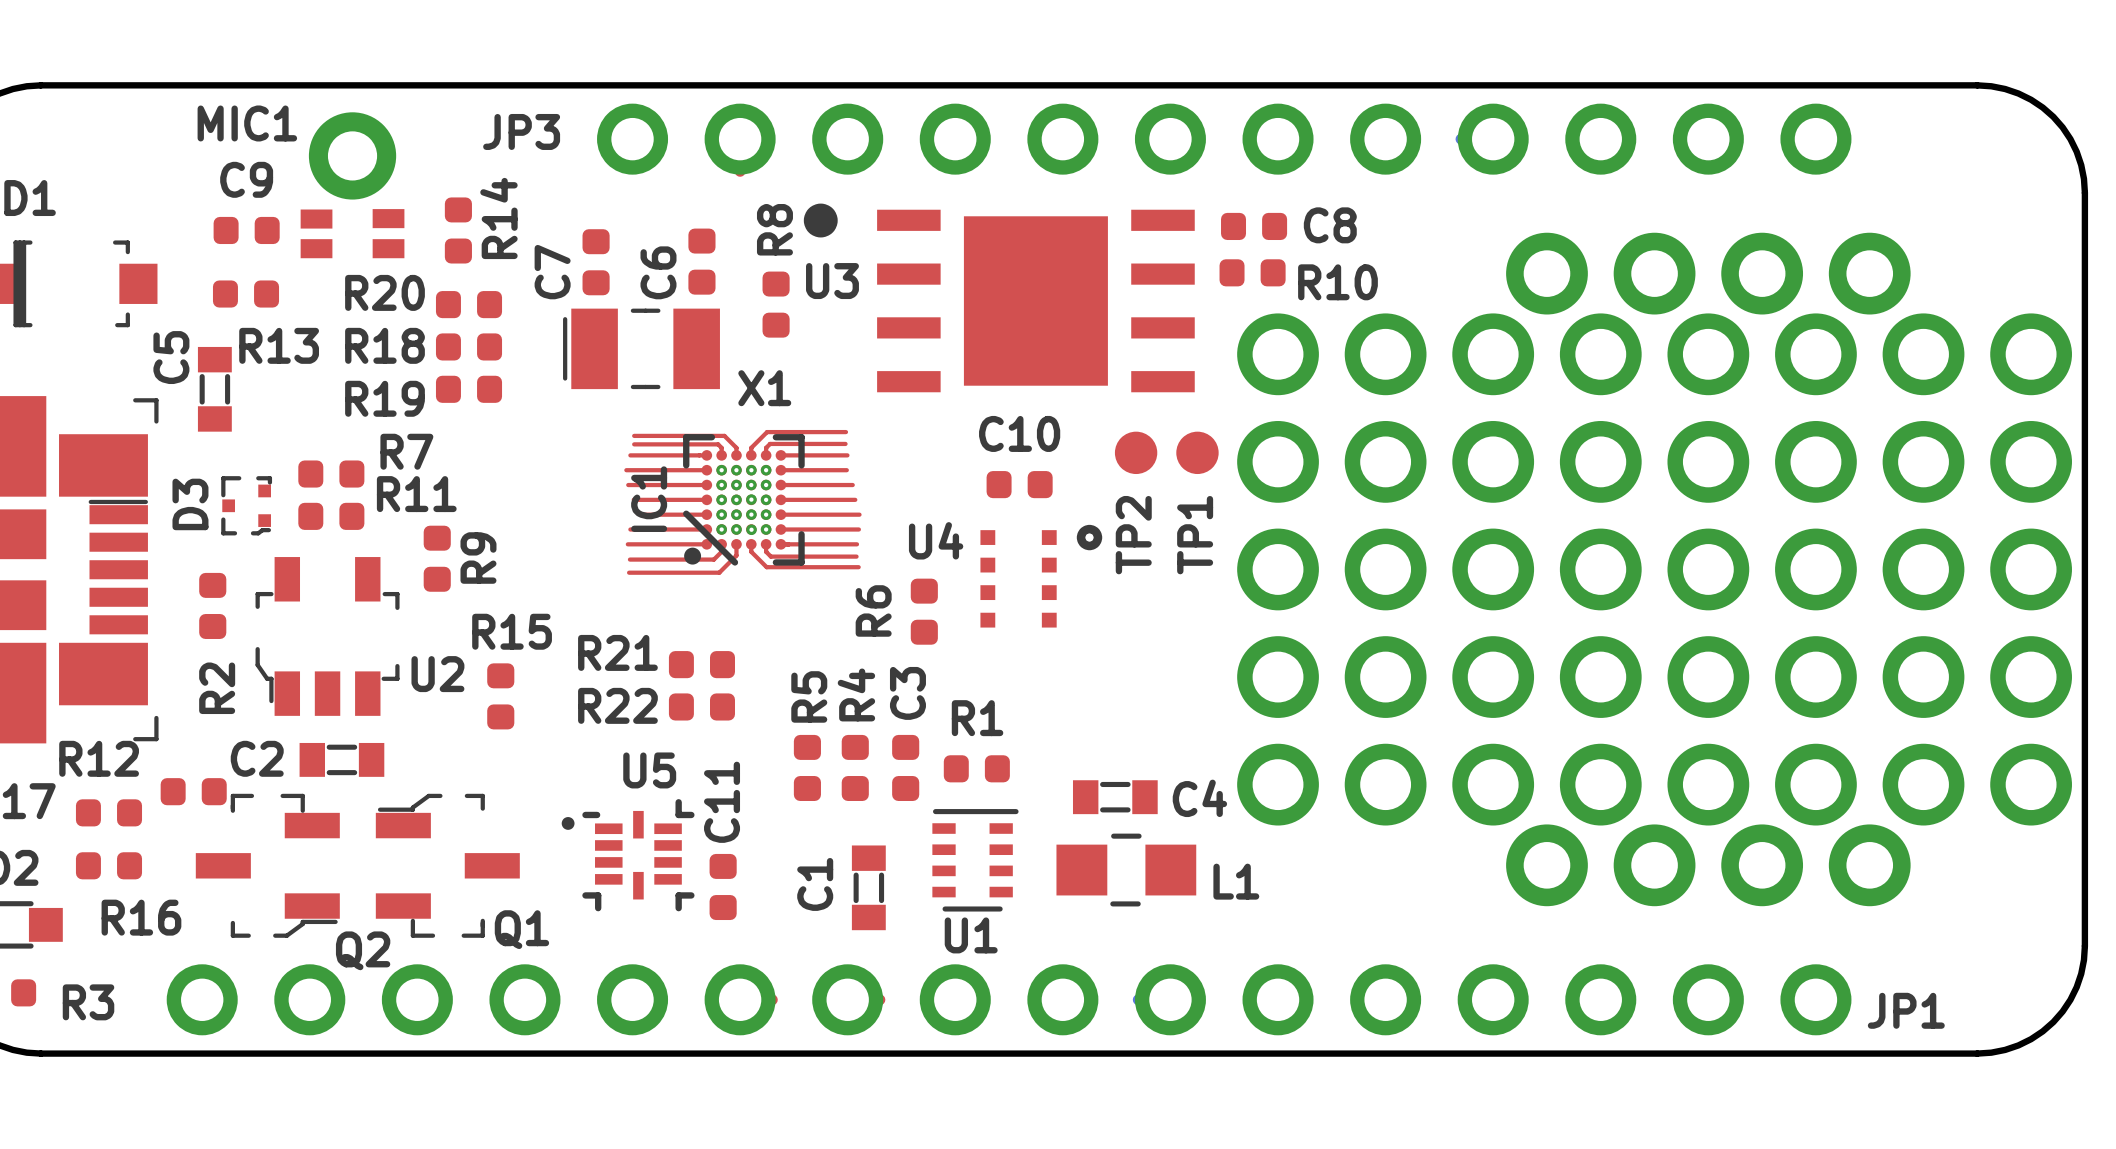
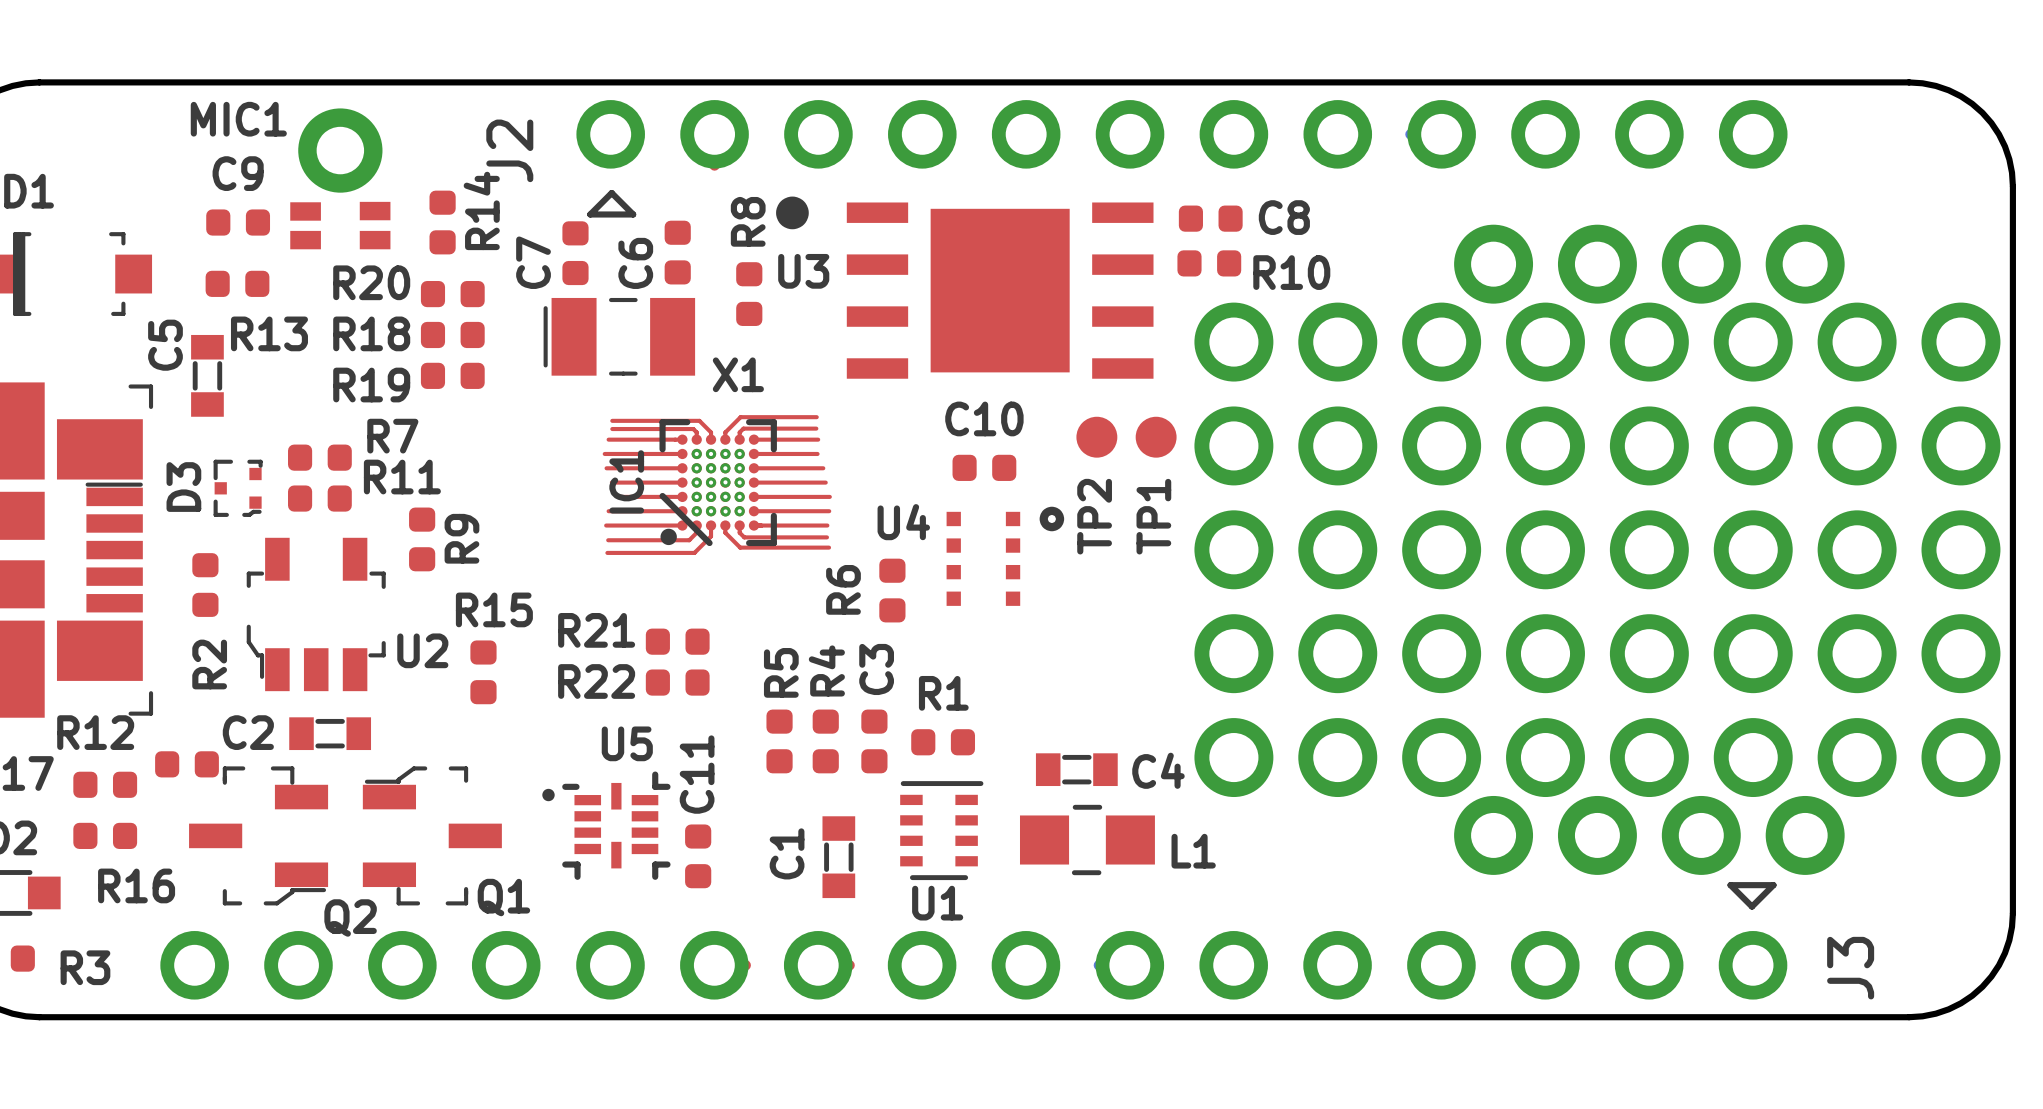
JP3: (1224, 139) -> none
J2: none -> (1181, 158)
J3: none -> (973, 940)
JP1: (1009, 999) -> none

